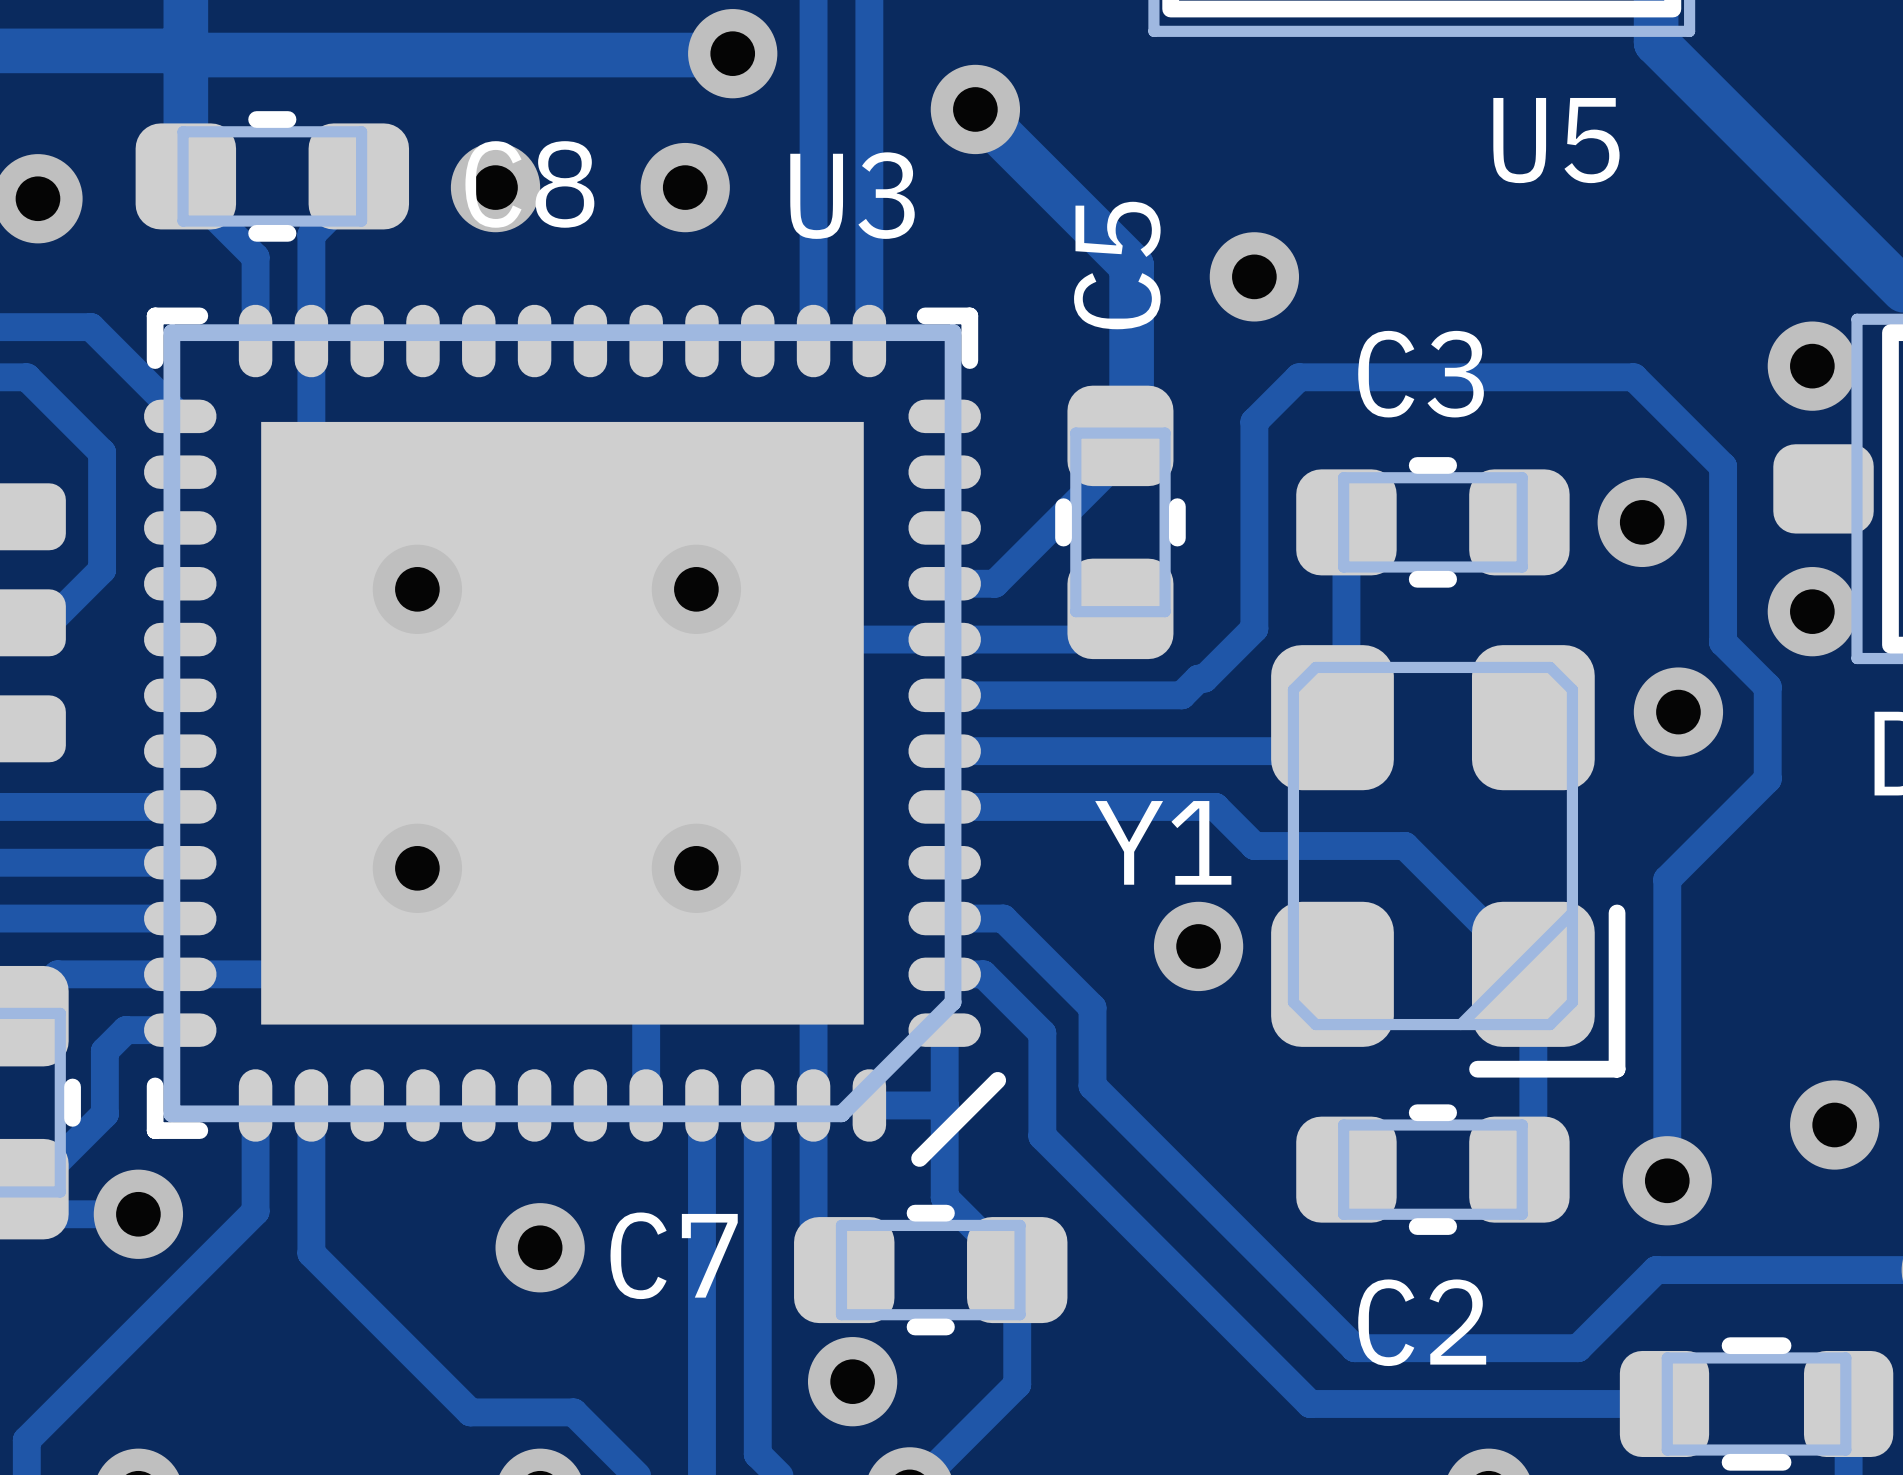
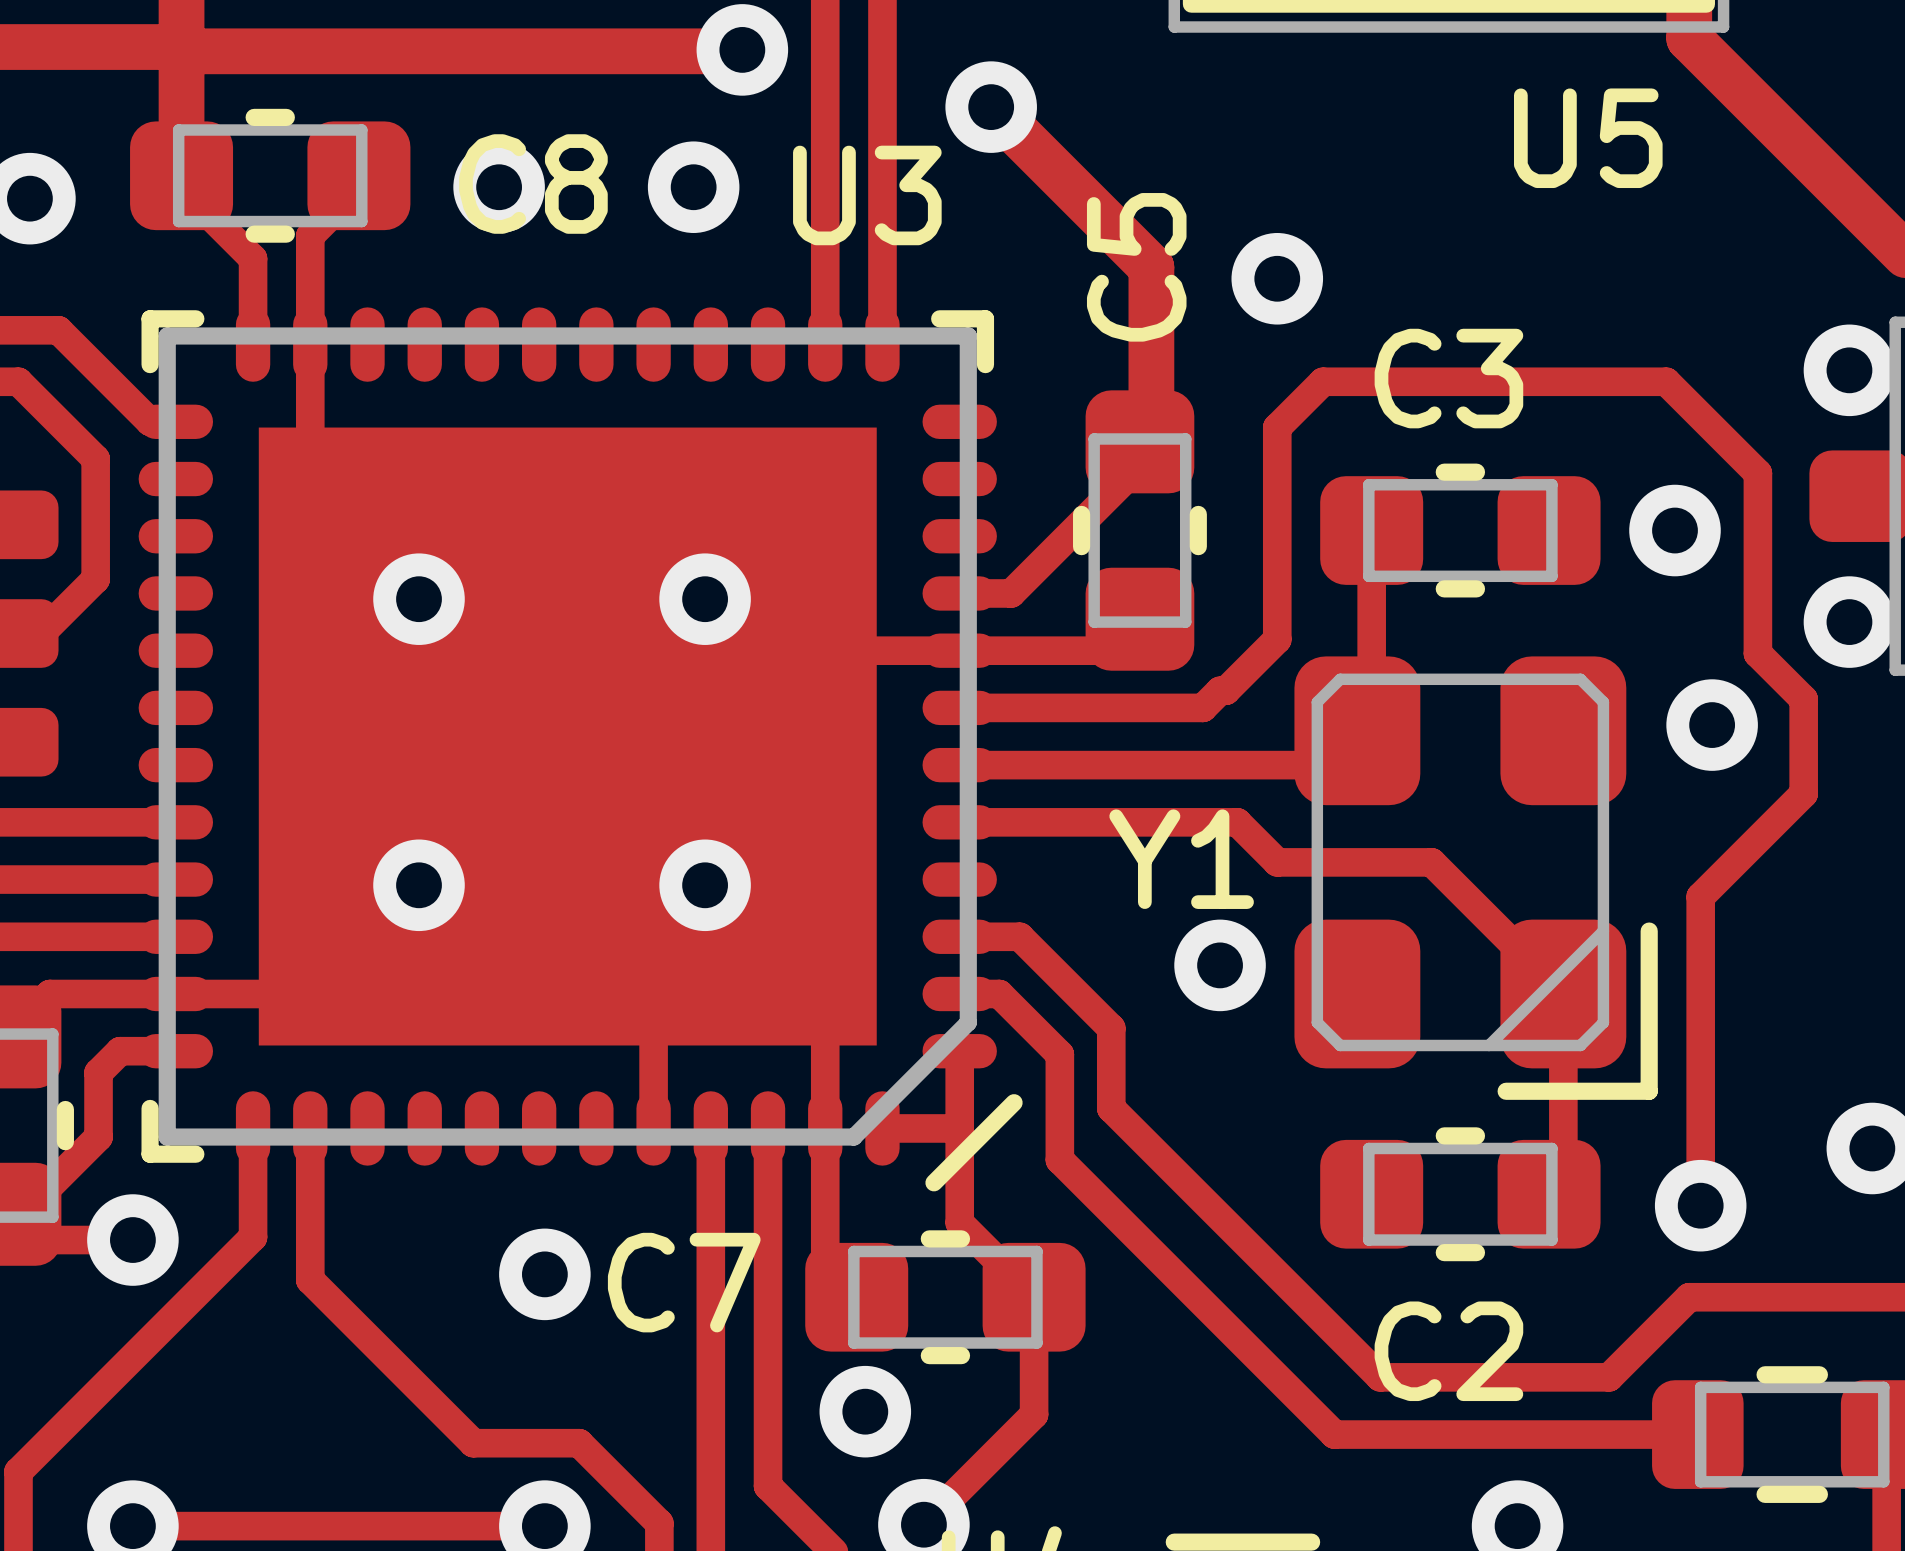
track: (65, 327) (91, 327) (180, 416) -> (58, 330) (150, 421) (175, 421)

